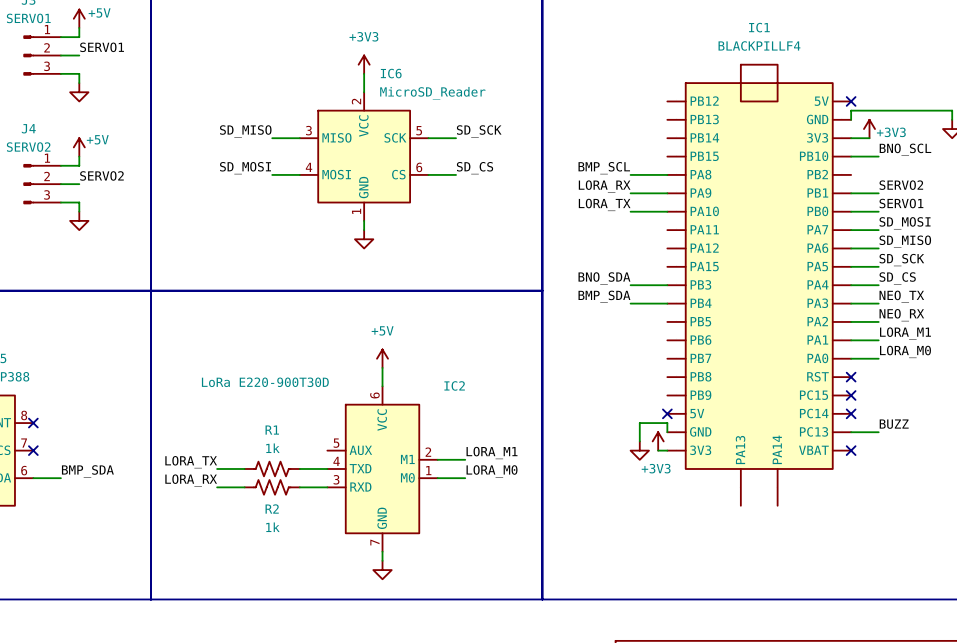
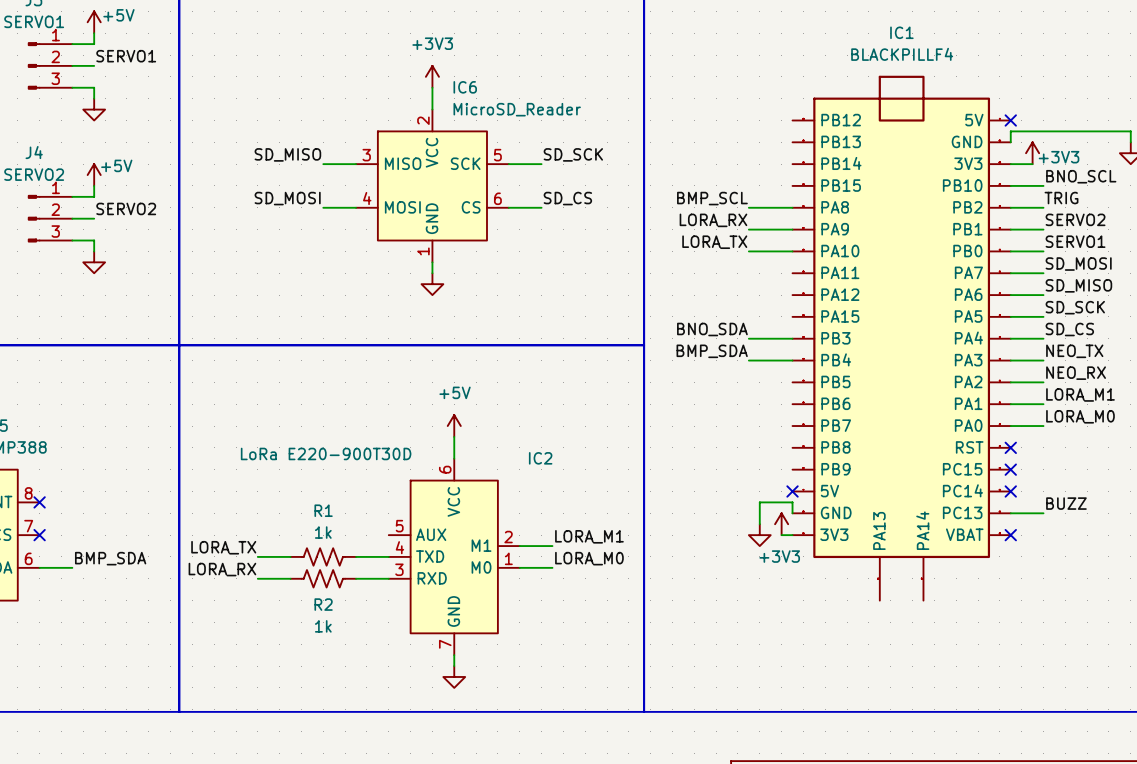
label: none -> TRIG (1061, 198)
wire: none -> (1010, 207) (1043, 207)

